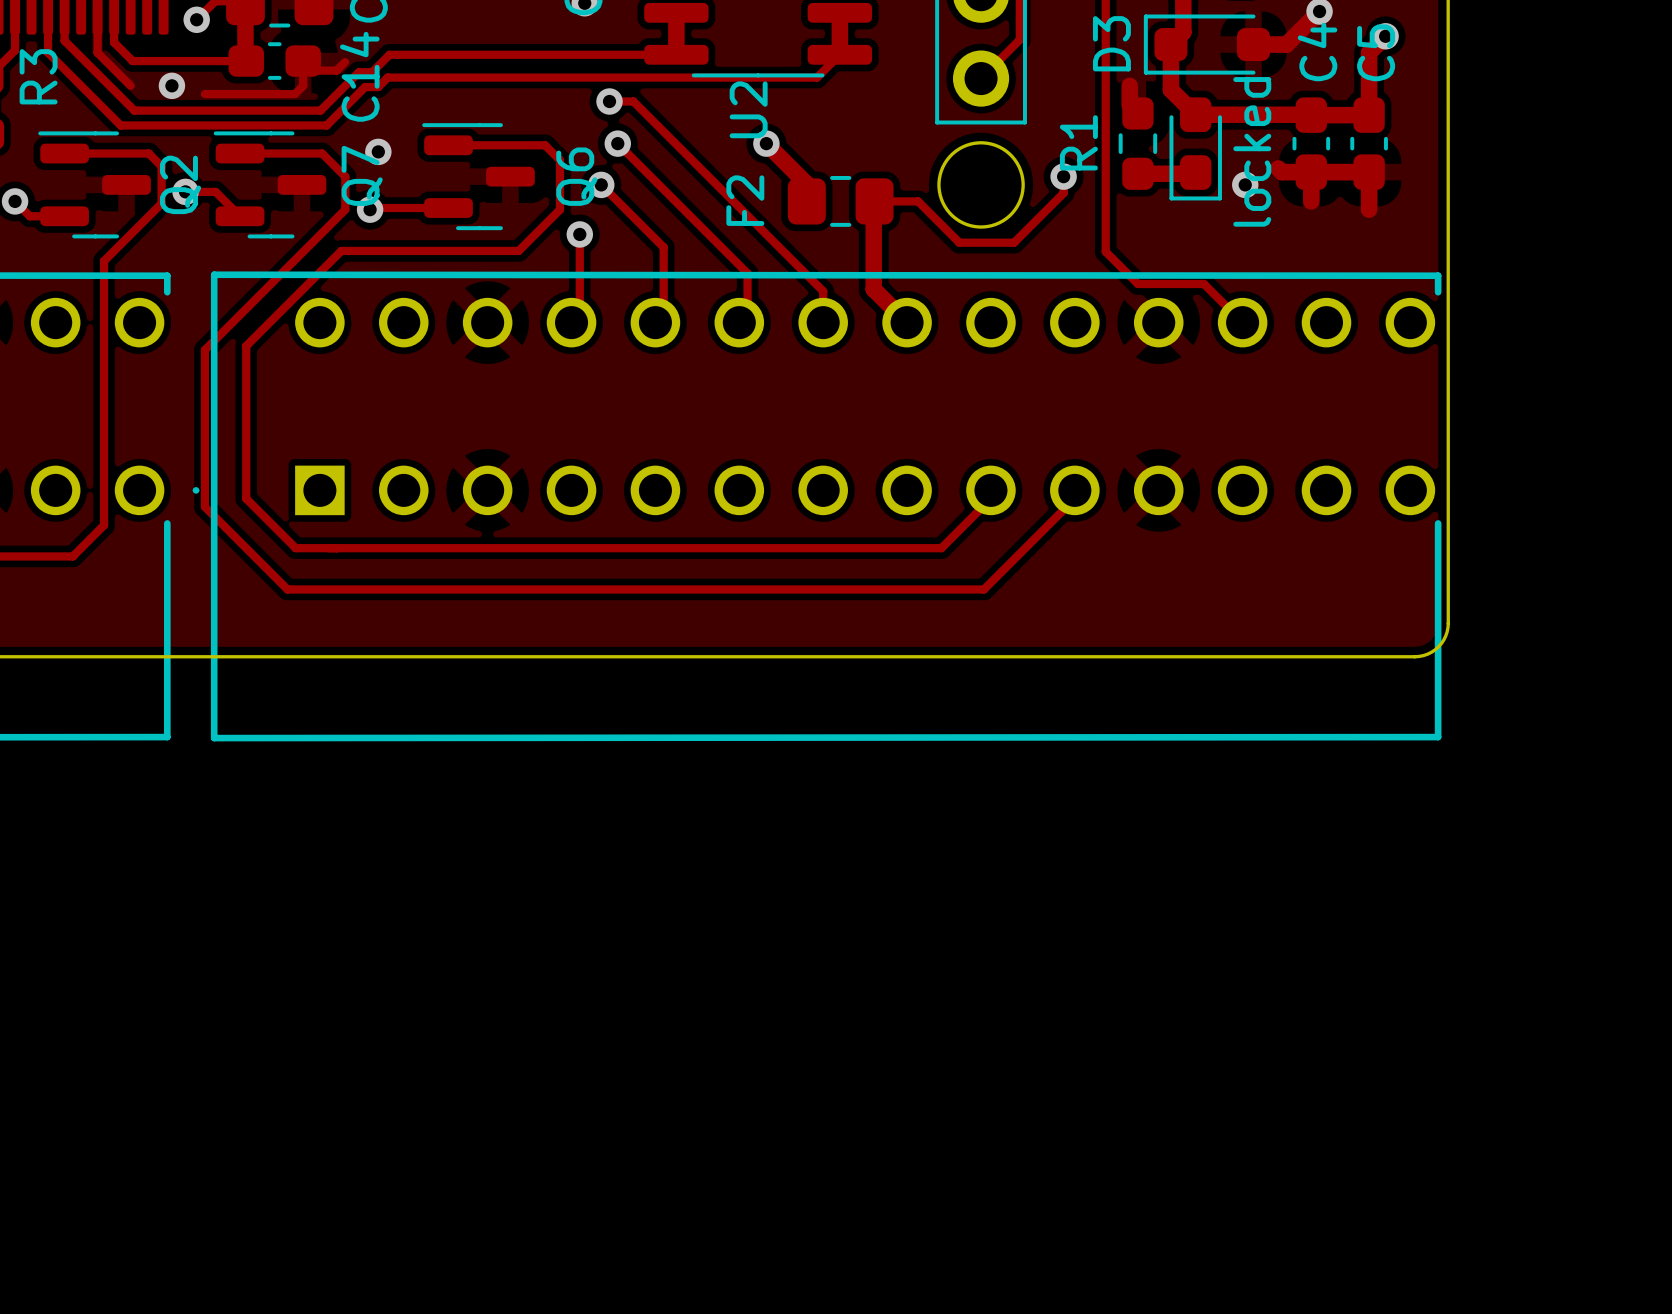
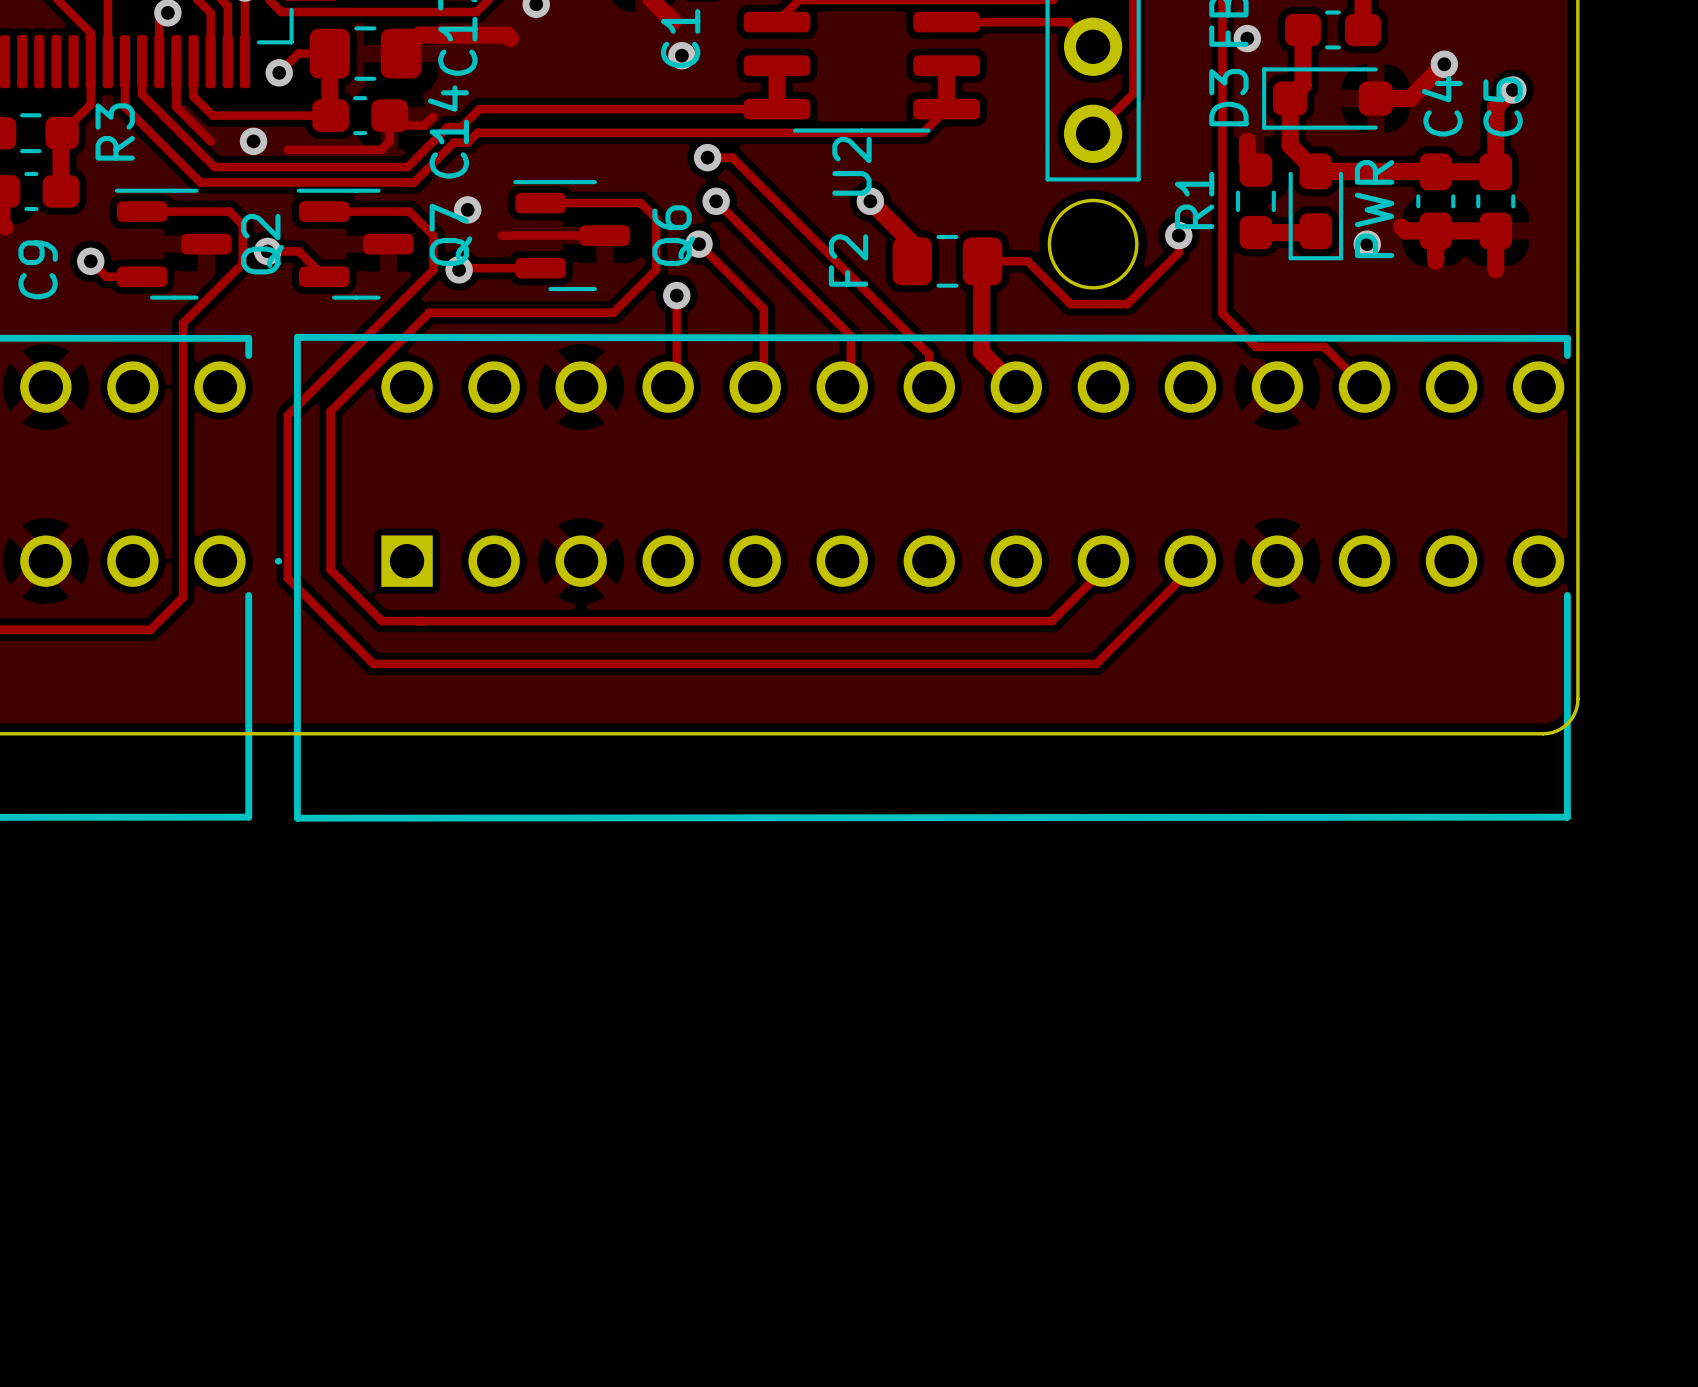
locked name: locked (1252, 151) -> PWR (1374, 209)
track: none -> (501, 235) (604, 235)

